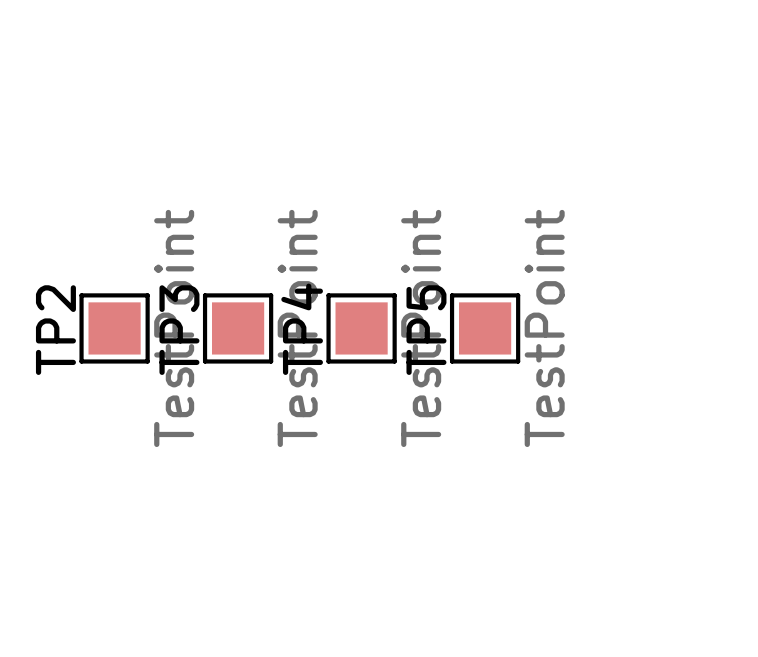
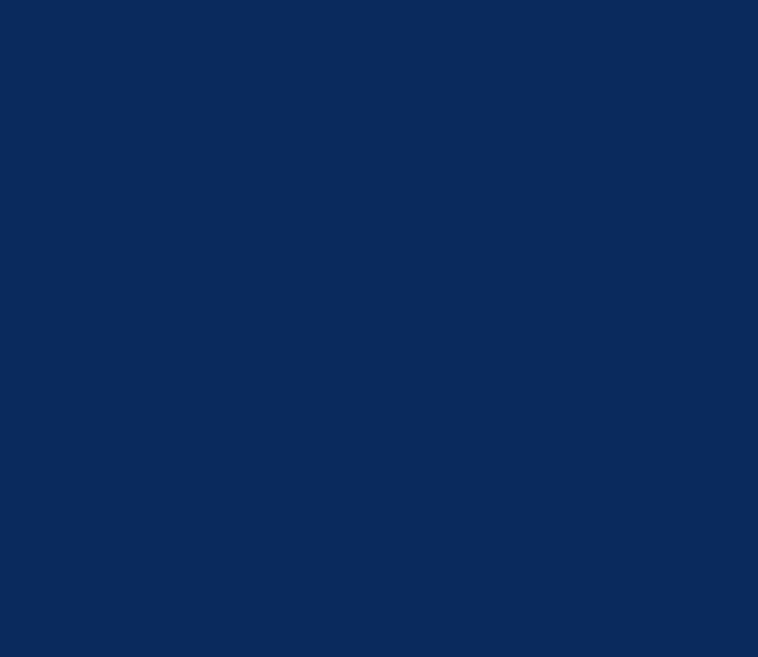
TP2: TestPoint (114, 328) -> none
TP3: TestPoint (238, 328) -> none
TP4: TestPoint (361, 328) -> none
TP5: TestPoint (485, 328) -> none

